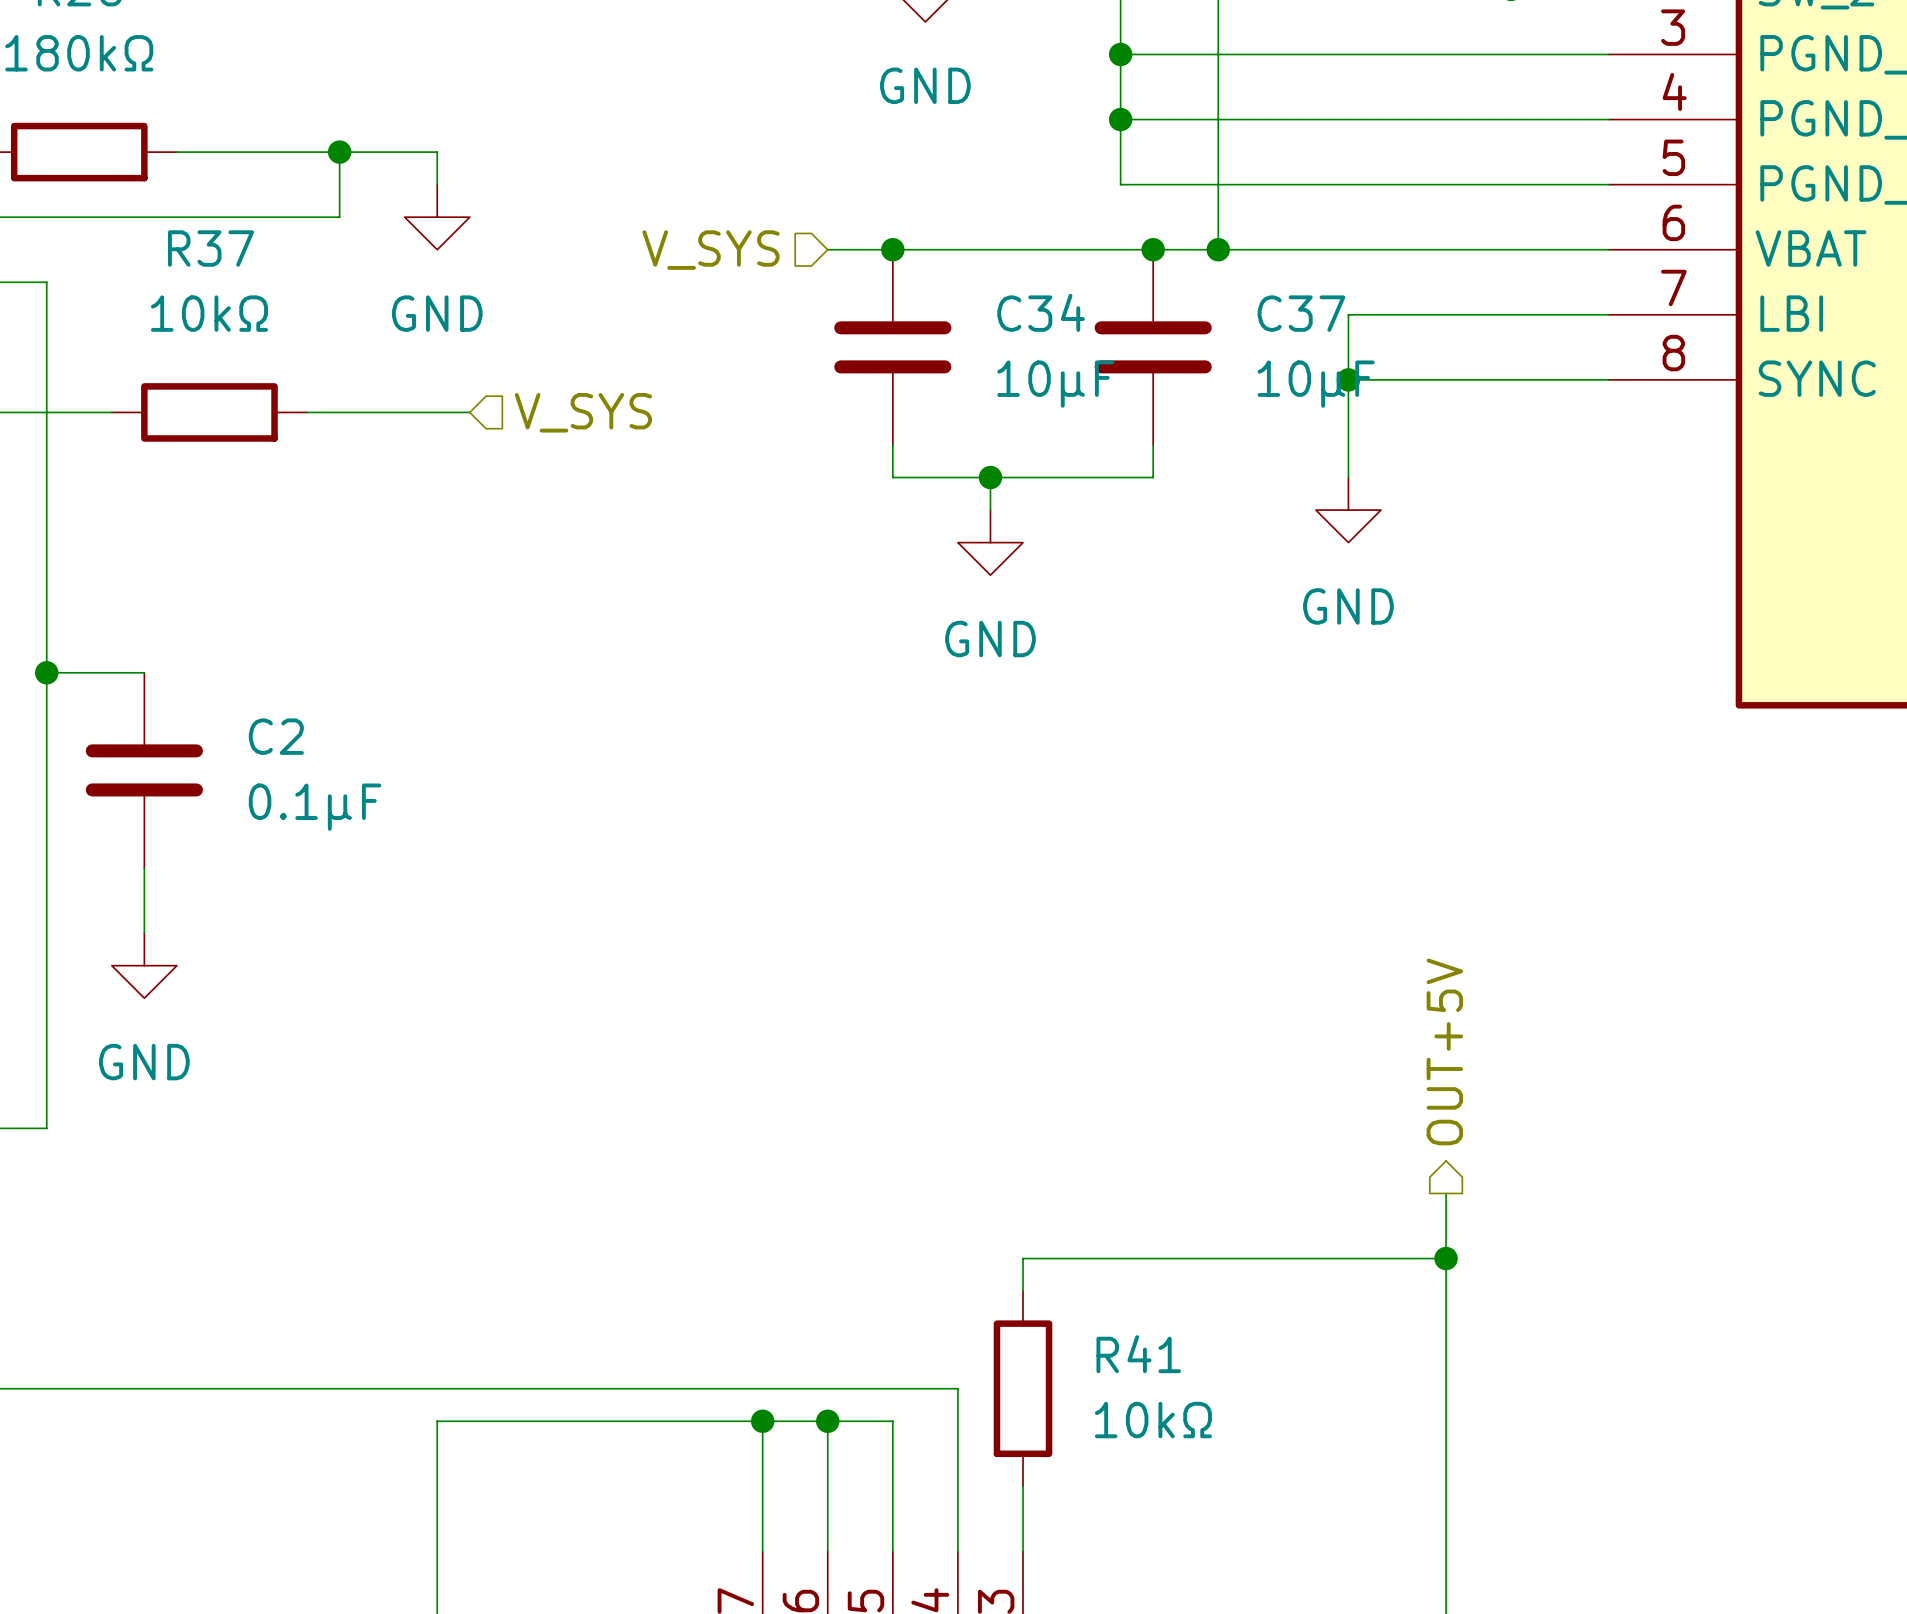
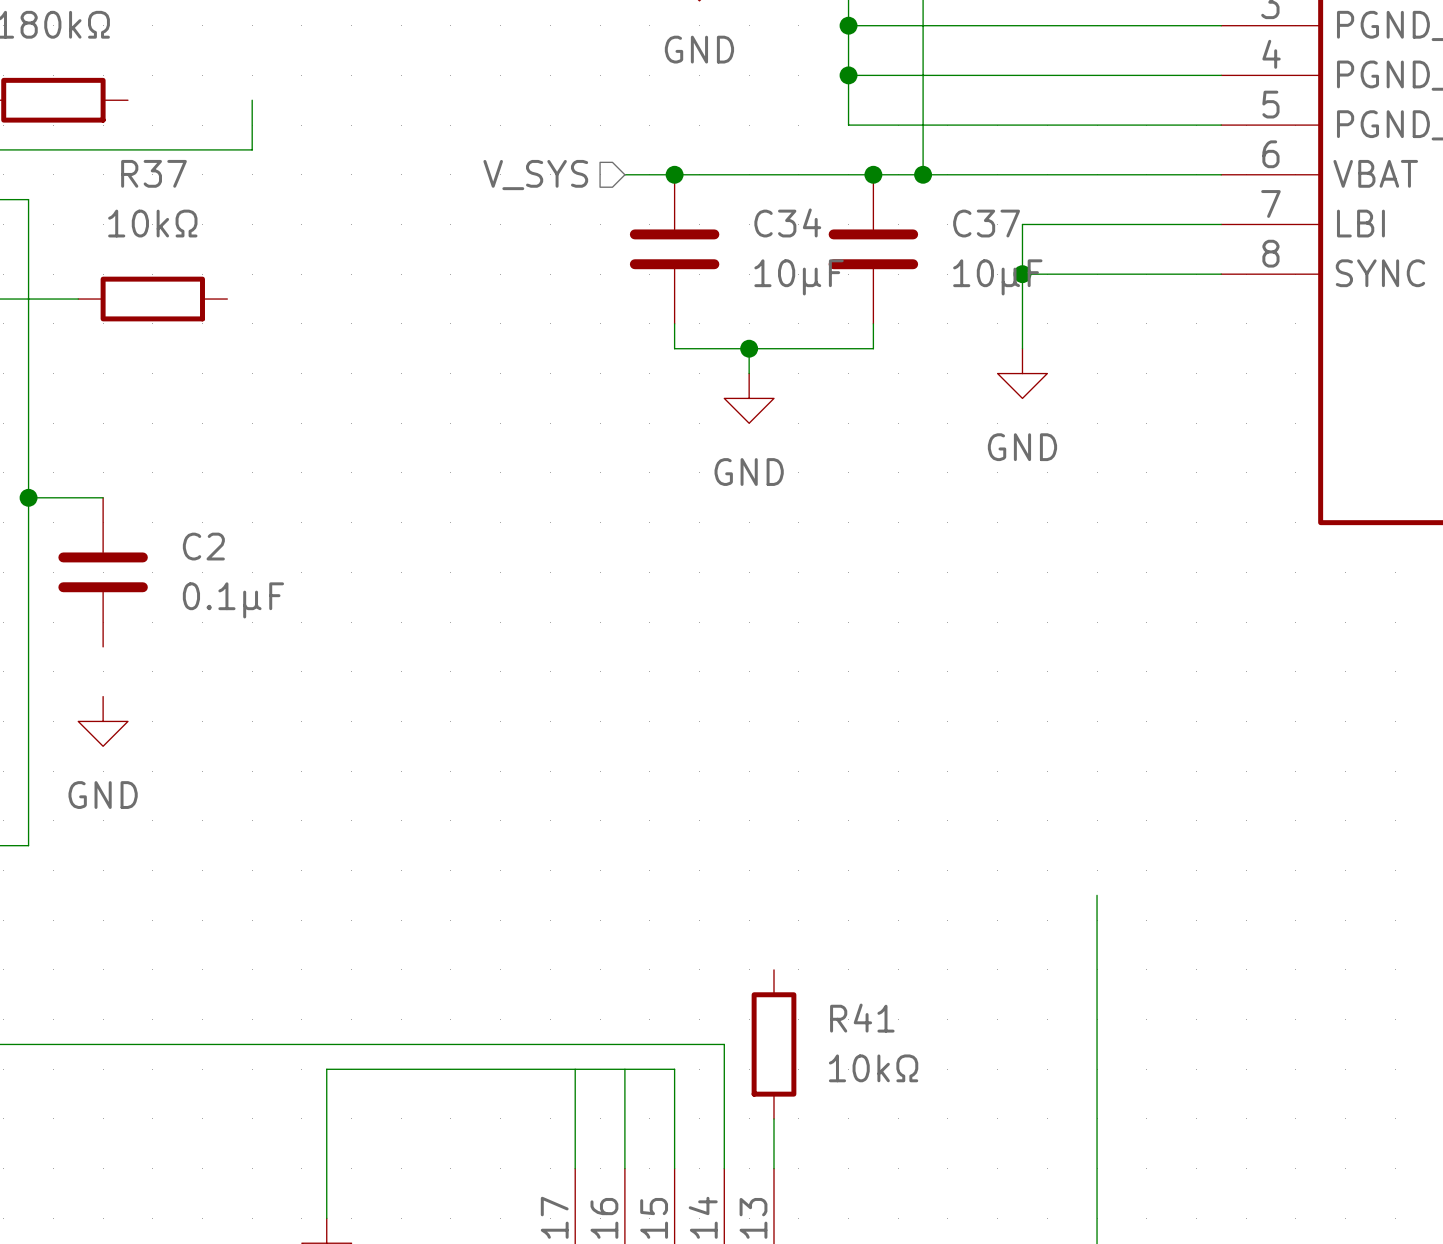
wire: (176, 152) (437, 152) (437, 184) -> none
junction: (339, 152) -> none
power symbol: GND (437, 217) -> none
wire: (307, 412) (469, 412) -> none
hierarchical label: V_SYS (583, 412) -> none
wire: (144, 868) (144, 933) -> none
hierarchical label: OUT+5V (1444, 1051) -> none
wire: (1446, 1258) (1023, 1258) (1023, 1291) -> none
junction: (1446, 1258) -> none
junction: (762, 1421) -> none
junction: (827, 1421) -> none

